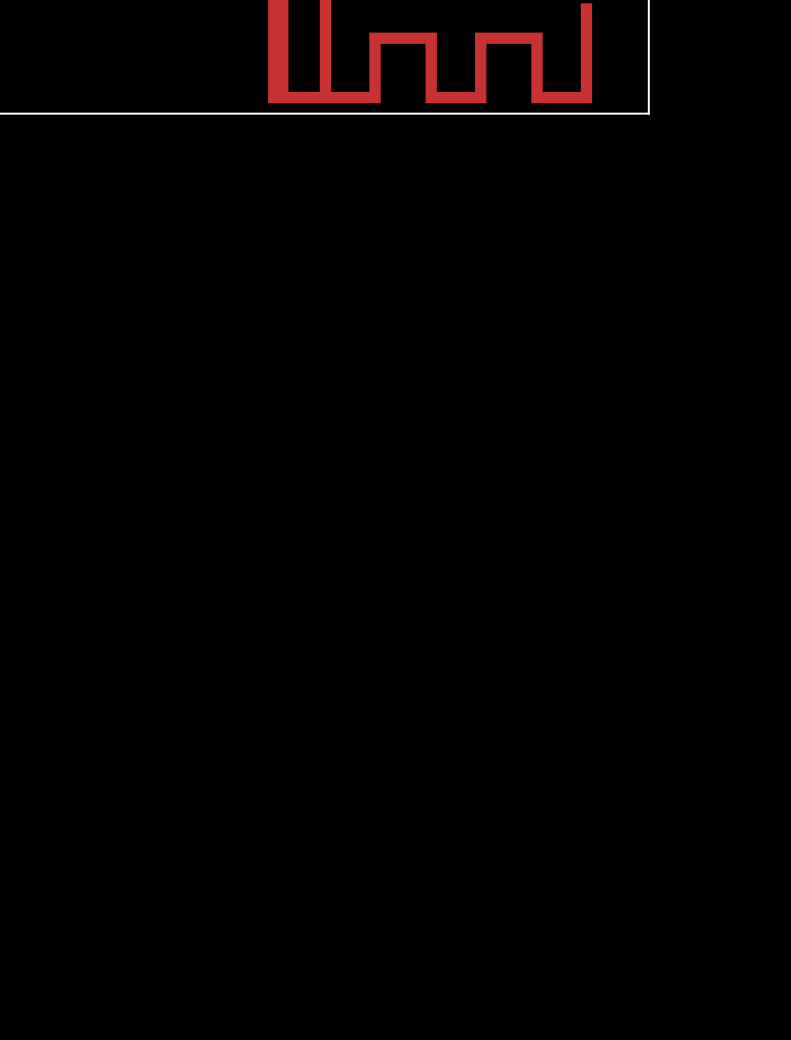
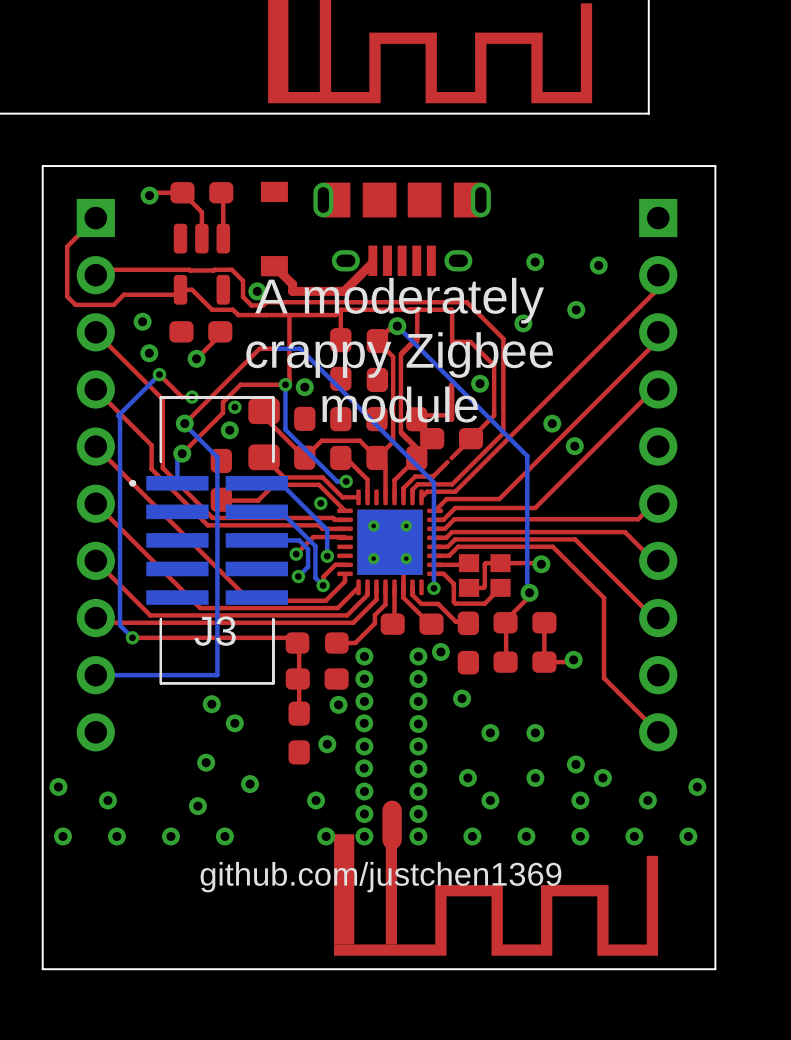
board edge: none -> (715, 166) (42, 166) (42, 969) (715, 969) (715, 166)
part: none -> (201, 192)
top track: none -> (223, 194) (223, 238)
top track: none -> (149, 195) (152, 192) (182, 192) (201, 212) (201, 238)
via: none -> (149, 195)
top track: none -> (95, 218) (67, 246) (67, 296) (75, 304) (113, 304) (123, 294) (175, 294) (180, 289) (192, 289) (212, 309) (233, 309) (238, 315) (335, 315) (341, 309) (452, 309) (452, 341) (470, 341) (494, 365) (494, 415) (451, 458)
part: none -> (274, 229)
part: none -> (402, 229)
top track: none -> (372, 262) (344, 291) (292, 291) (292, 284) (274, 266)
via: none -> (535, 262)
part: none -> (201, 264)
via: none -> (598, 265)
top track: none -> (101, 269) (231, 269) (243, 280) (243, 296) (251, 305) (263, 305) (266, 302) (466, 302) (503, 338) (503, 433) (452, 484) (417, 484) (412, 489) (412, 497)
top track: none -> (653, 275) (653, 293) (455, 491) (427, 491) (421, 497)
via: none -> (257, 291)
text: none -> A moderately (399, 300)
top track: none -> (417, 309) (417, 341)
via: none -> (576, 309)
top track: none -> (340, 310) (340, 340)
top track: none -> (289, 315) (289, 380) (285, 384) (240, 384) (222, 402) (222, 412) (182, 453)
via: none -> (142, 321)
via: none -> (523, 323)
top track: none -> (397, 326) (392, 326) (377, 341) (393, 356) (393, 441) (377, 457)
bottom track: none -> (397, 326) (527, 456) (527, 594)
via: none -> (397, 326)
part: none -> (200, 331)
top track: none -> (95, 332) (162, 399) (162, 468) (212, 517) (333, 517) (334, 519) (345, 519)
top track: none -> (219, 336) (196, 358)
top track: none -> (417, 337) (400, 354) (400, 432) (417, 449)
top track: none -> (653, 344) (499, 499) (446, 499) (435, 510)
top track: none -> (274, 348) (259, 348) (184, 423)
bottom track: none -> (274, 348) (300, 348) (433, 482) (433, 588)
via: none -> (149, 353)
text: none -> crappy Zigbee (399, 355)
via: none -> (196, 358)
part: none -> (340, 359)
part: none -> (377, 360)
top track: none -> (159, 374) (181, 397) (192, 397)
bottom track: none -> (159, 374) (118, 415) (120, 417) (120, 625) (132, 637)
via: none -> (159, 374)
via: none -> (480, 383)
bottom track: none -> (285, 384) (285, 429) (337, 481) (346, 481)
via: none -> (285, 384)
top track: none -> (451, 384) (451, 419)
via: none -> (304, 387)
top track: none -> (95, 389) (151, 445) (151, 469) (207, 525) (319, 525) (322, 528) (345, 528)
top track: none -> (653, 389) (535, 508) (455, 508) (443, 519) (435, 519)
via: none -> (192, 397)
text: none -> module (400, 404)
via: none -> (234, 407)
top track: none -> (447, 415) (418, 415)
top track: none -> (264, 416) (304, 457) (321, 440) (359, 440) (385, 466) (385, 497)
via: none -> (184, 423)
via: none -> (552, 423)
bottom track: none -> (184, 424) (217, 457) (217, 675) (95, 675)
via: none -> (229, 430)
part: none -> (264, 434)
part: none -> (304, 438)
part: none -> (340, 438)
part: none -> (377, 438)
part: none -> (416, 438)
part: none -> (451, 438)
top track: none -> (95, 446) (249, 600) (325, 600) (345, 581) (345, 573)
via: none -> (574, 446)
via: none -> (182, 453)
bottom track: none -> (180, 455) (177, 458) (177, 483)
top track: none -> (264, 457) (284, 477) (322, 477) (342, 497) (358, 497)
top track: none -> (416, 458) (394, 480) (394, 497)
top track: none -> (340, 462) (350, 462) (367, 479) (367, 497)
top track: none -> (447, 462) (433, 476) (415, 476) (403, 488) (403, 497)
part: none -> (95, 475)
part: none -> (658, 475)
part: none -> (221, 480)
via: none -> (346, 481)
bottom track: none -> (280, 483) (327, 529) (327, 556)
top track: none -> (220, 500) (258, 500) (273, 484) (318, 484) (345, 510)
top track: none -> (95, 503) (200, 608) (337, 608) (358, 587)
via: none -> (320, 503)
top track: none -> (653, 503) (638, 519) (454, 519) (444, 528) (435, 528)
bottom track: none -> (281, 511) (315, 546) (315, 577) (323, 585)
top track: none -> (345, 537) (313, 537) (296, 554)
top track: none -> (435, 537) (446, 537) (451, 532) (624, 532) (653, 560)
J3: none -> (208, 540)
bottom track: none -> (256, 540) (299, 540) (308, 549) (308, 566) (298, 576)
part: none -> (390, 542)
top track: none -> (435, 546) (447, 546) (455, 539) (575, 539) (653, 618)
via: none -> (296, 554)
top track: none -> (403, 555) (403, 597) (429, 624)
top track: none -> (435, 555) (449, 555) (458, 546) (552, 546) (604, 598) (604, 678) (658, 732)
via: none -> (327, 556)
top track: none -> (95, 560) (150, 615) (347, 615) (367, 595) (367, 587)
top track: none -> (345, 564) (335, 564) (323, 576) (323, 586)
top track: none -> (467, 564) (435, 564)
top track: none -> (541, 564) (485, 563) (484, 586) (469, 587)
via: none -> (541, 564)
top track: none -> (435, 573) (443, 573) (453, 583) (453, 601) (455, 603) (484, 603) (500, 587)
part: none -> (484, 575)
via: none -> (298, 576)
via: none -> (323, 585)
top track: none -> (376, 587) (376, 599) (353, 622) (100, 622)
top track: none -> (385, 587) (385, 604) (374, 615) (374, 623) (355, 643) (335, 643)
top track: none -> (394, 587) (394, 622)
top track: none -> (412, 587) (412, 595) (421, 603) (438, 603) (455, 621) (468, 621)
via: none -> (433, 588)
top track: none -> (529, 592) (529, 596) (505, 620)
via: none -> (529, 592)
top track: none -> (544, 620) (544, 662) (571, 662)
part: none -> (525, 622)
top track: none -> (506, 623) (506, 662)
part: none -> (412, 624)
via: none -> (132, 637)
top track: none -> (292, 637) (132, 637)
part: none -> (317, 643)
part: none -> (468, 643)
top track: none -> (299, 644) (299, 713)
via: none -> (440, 652)
via: none -> (364, 656)
via: none -> (418, 656)
via: none -> (573, 659)
part: none -> (525, 662)
part: none -> (317, 679)
via: none -> (364, 679)
via: none -> (418, 679)
via: none -> (462, 698)
via: none -> (364, 701)
via: none -> (418, 701)
via: none -> (211, 704)
via: none -> (338, 704)
via: none -> (234, 723)
via: none -> (364, 723)
via: none -> (418, 723)
part: none -> (299, 732)
via: none -> (490, 732)
via: none -> (535, 732)
via: none -> (327, 744)
via: none -> (364, 746)
via: none -> (418, 746)
via: none -> (206, 762)
via: none -> (575, 764)
via: none -> (364, 768)
via: none -> (418, 768)
via: none -> (467, 777)
via: none -> (535, 777)
via: none -> (602, 777)
via: none -> (250, 784)
via: none -> (58, 786)
via: none -> (697, 786)
via: none -> (364, 791)
via: none -> (418, 791)
via: none -> (107, 800)
via: none -> (316, 800)
via: none -> (490, 800)
via: none -> (580, 800)
via: none -> (647, 800)
via: none -> (197, 806)
top track: none -> (392, 810) (392, 839)
via: none -> (364, 813)
via: none -> (418, 813)
via: none -> (62, 836)
via: none -> (116, 836)
via: none -> (170, 836)
via: none -> (224, 836)
via: none -> (326, 836)
via: none -> (364, 836)
via: none -> (418, 836)
via: none -> (472, 836)
via: none -> (526, 836)
via: none -> (580, 836)
via: none -> (634, 836)
via: none -> (688, 836)
text: none -> github.com/justchen1369 (380, 877)
part: none -> (496, 894)

